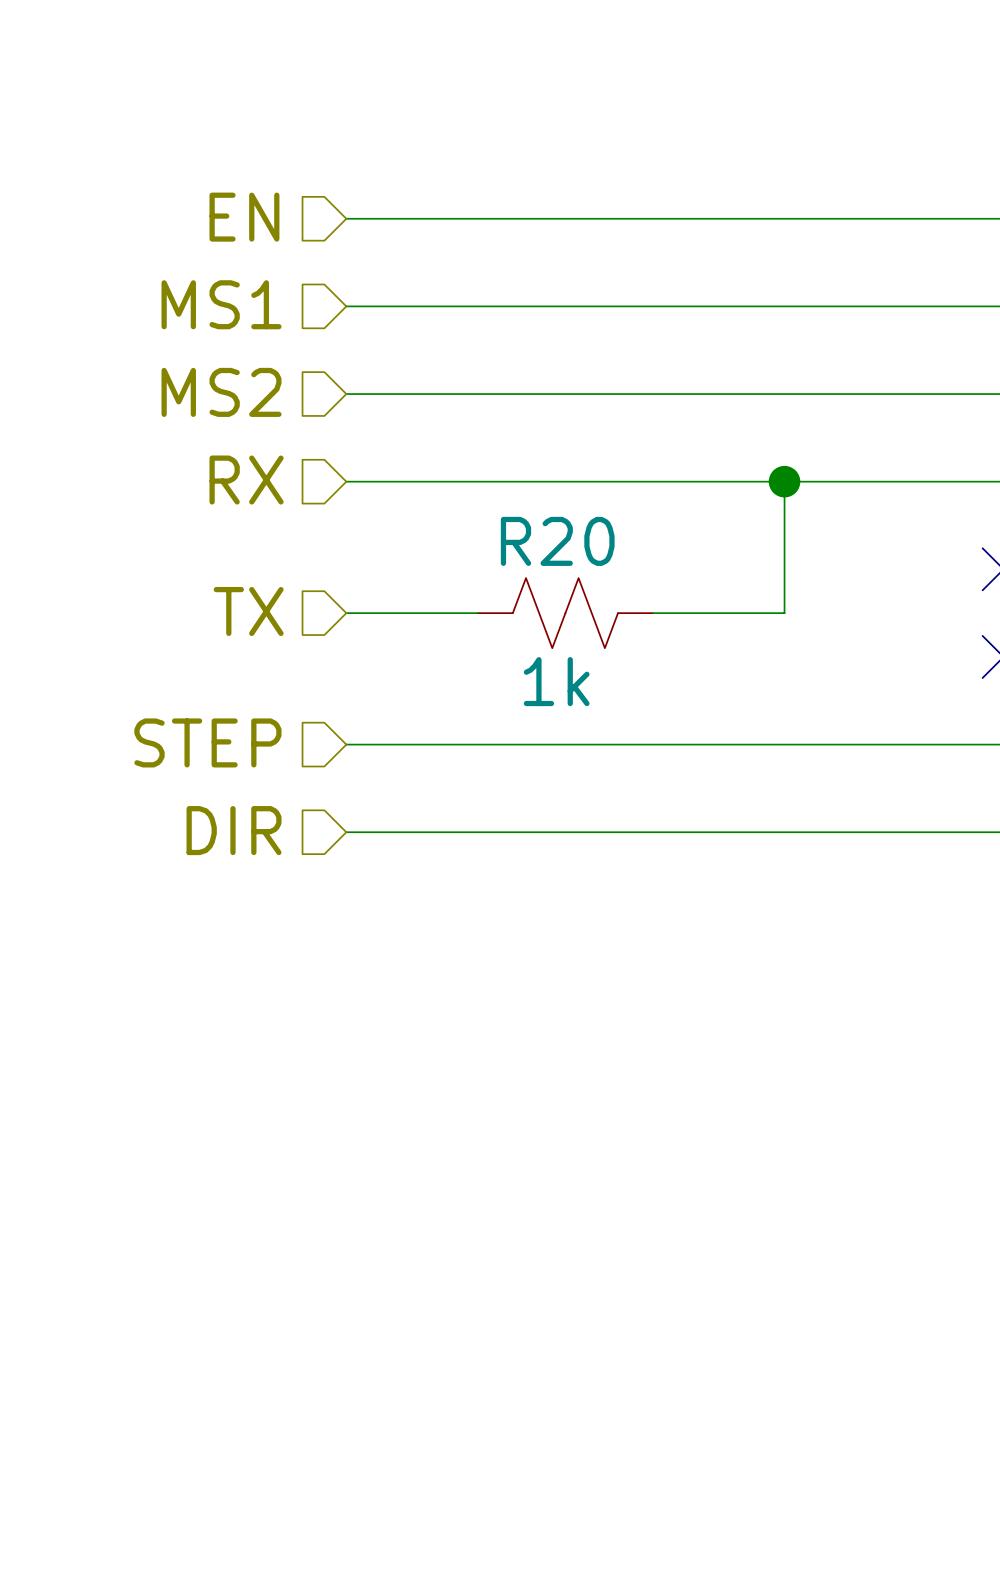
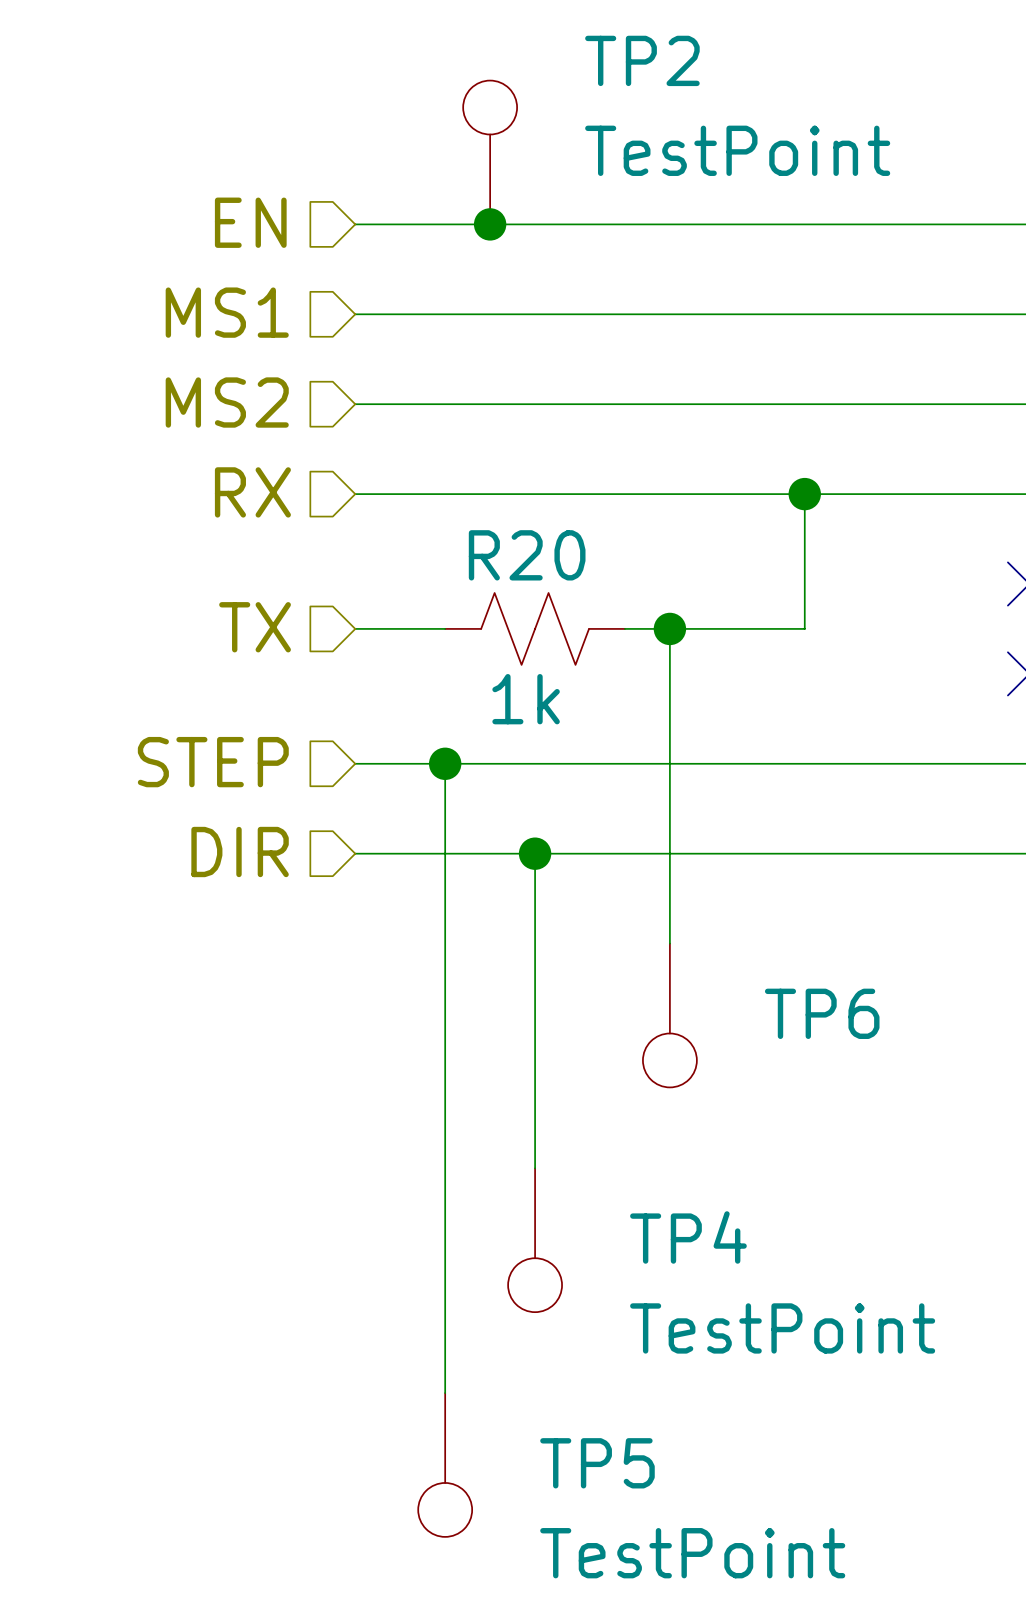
TP2: none -> TestPoint (490, 152)
junction: none -> (490, 224)
R20 position: (565, 613) -> (535, 628)
wire: none -> (624, 628) (669, 628) (669, 943)
junction: none -> (669, 628)
wire: none -> (445, 763) (445, 1393)
junction: none -> (445, 763)
wire: none -> (535, 853) (535, 1168)
junction: none -> (535, 853)
TP6: none -> (669, 1015)
TP4: none -> TestPoint (535, 1240)
TP5: none -> TestPoint (445, 1464)

